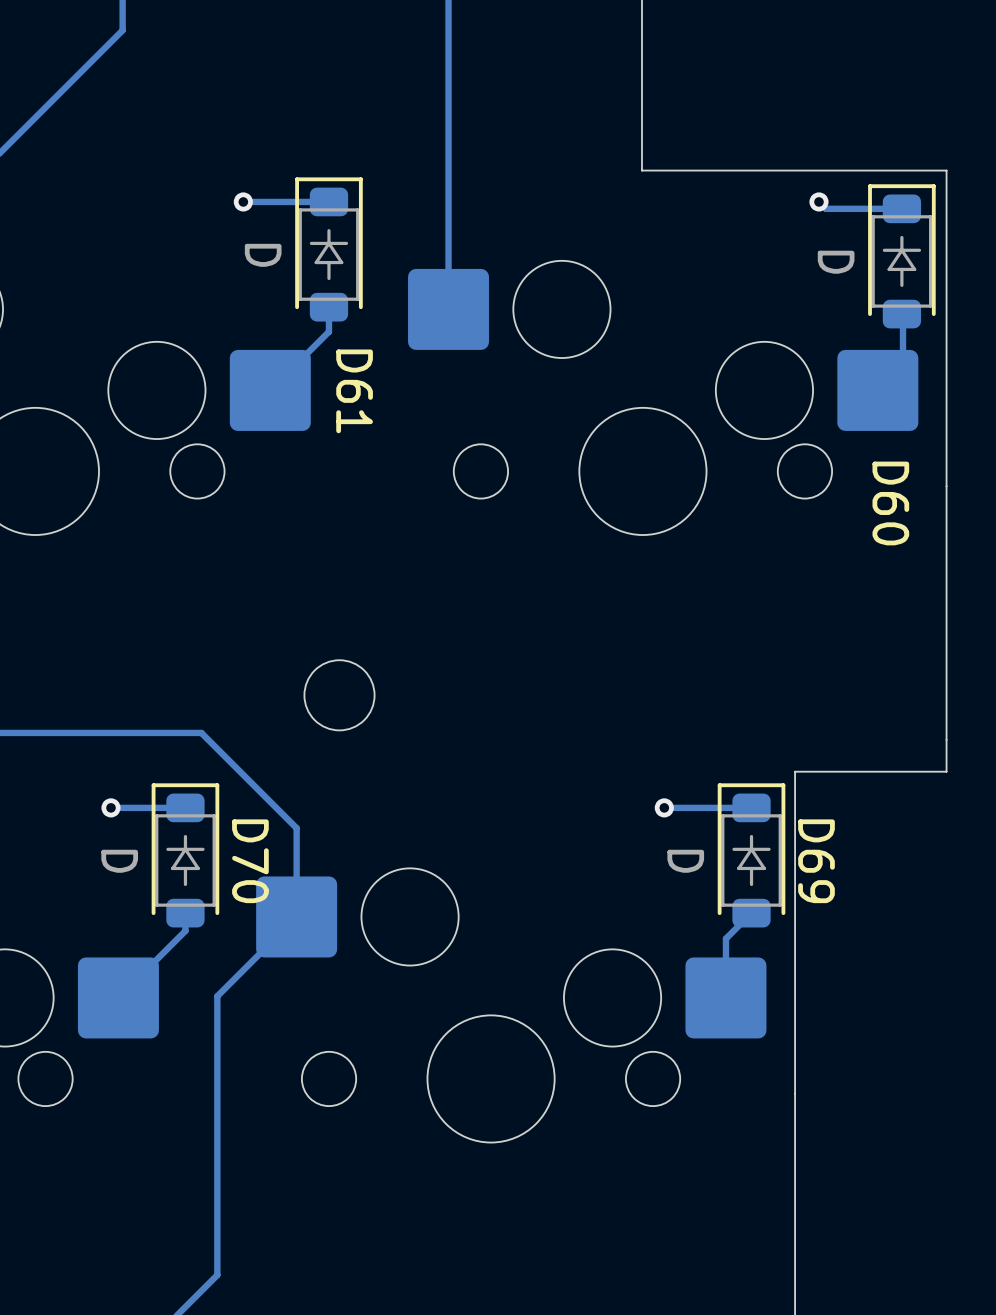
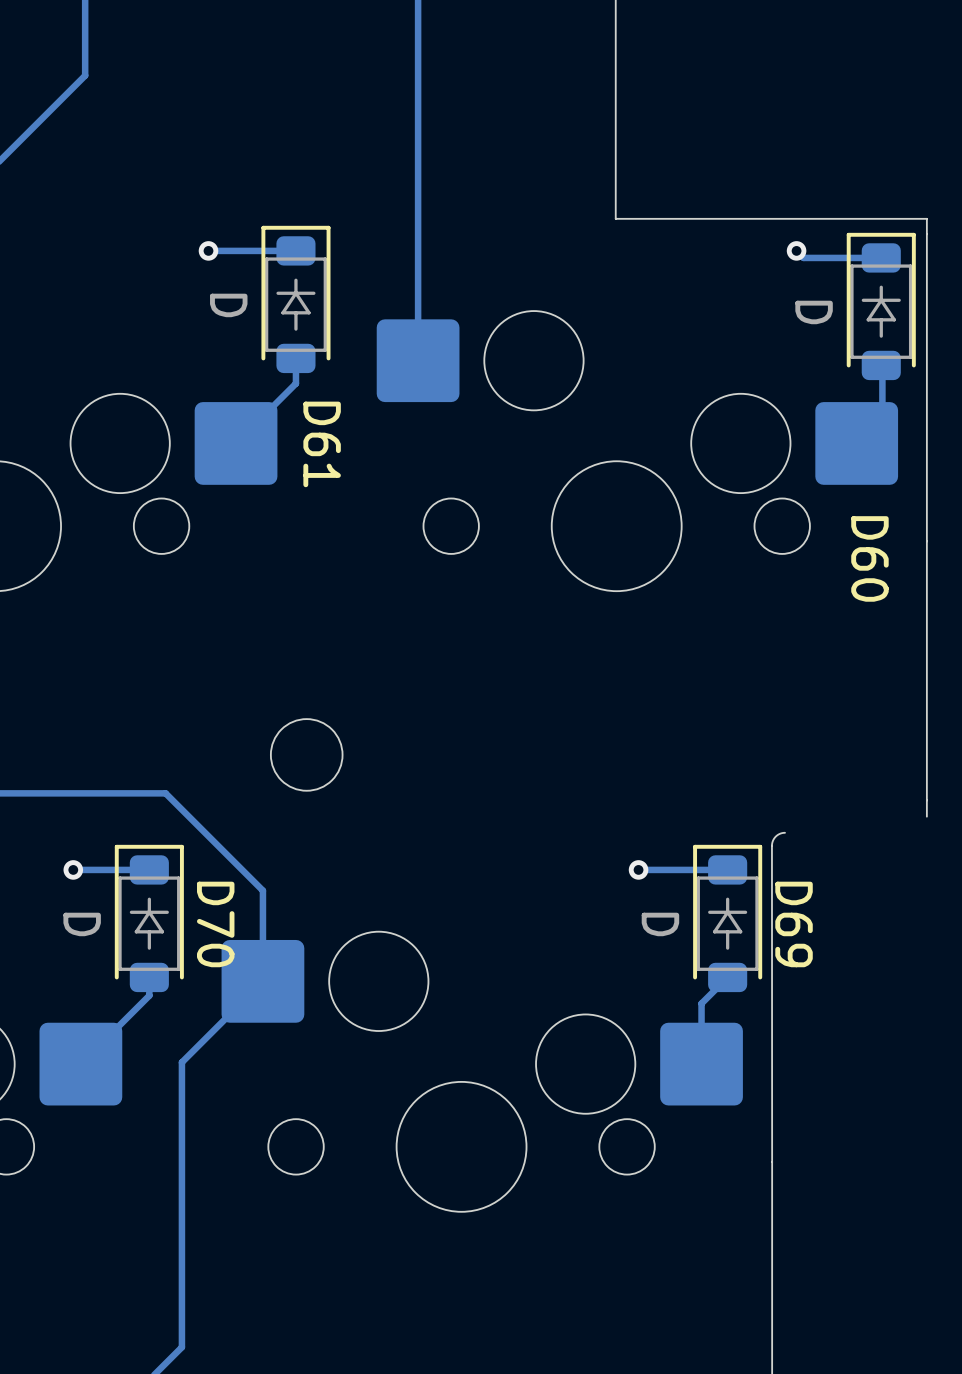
board edge: (946, 755) (946, 771) (795, 771) (795, 1093) -> (784, 832) (775, 836) (771, 845) (772, 1162)

